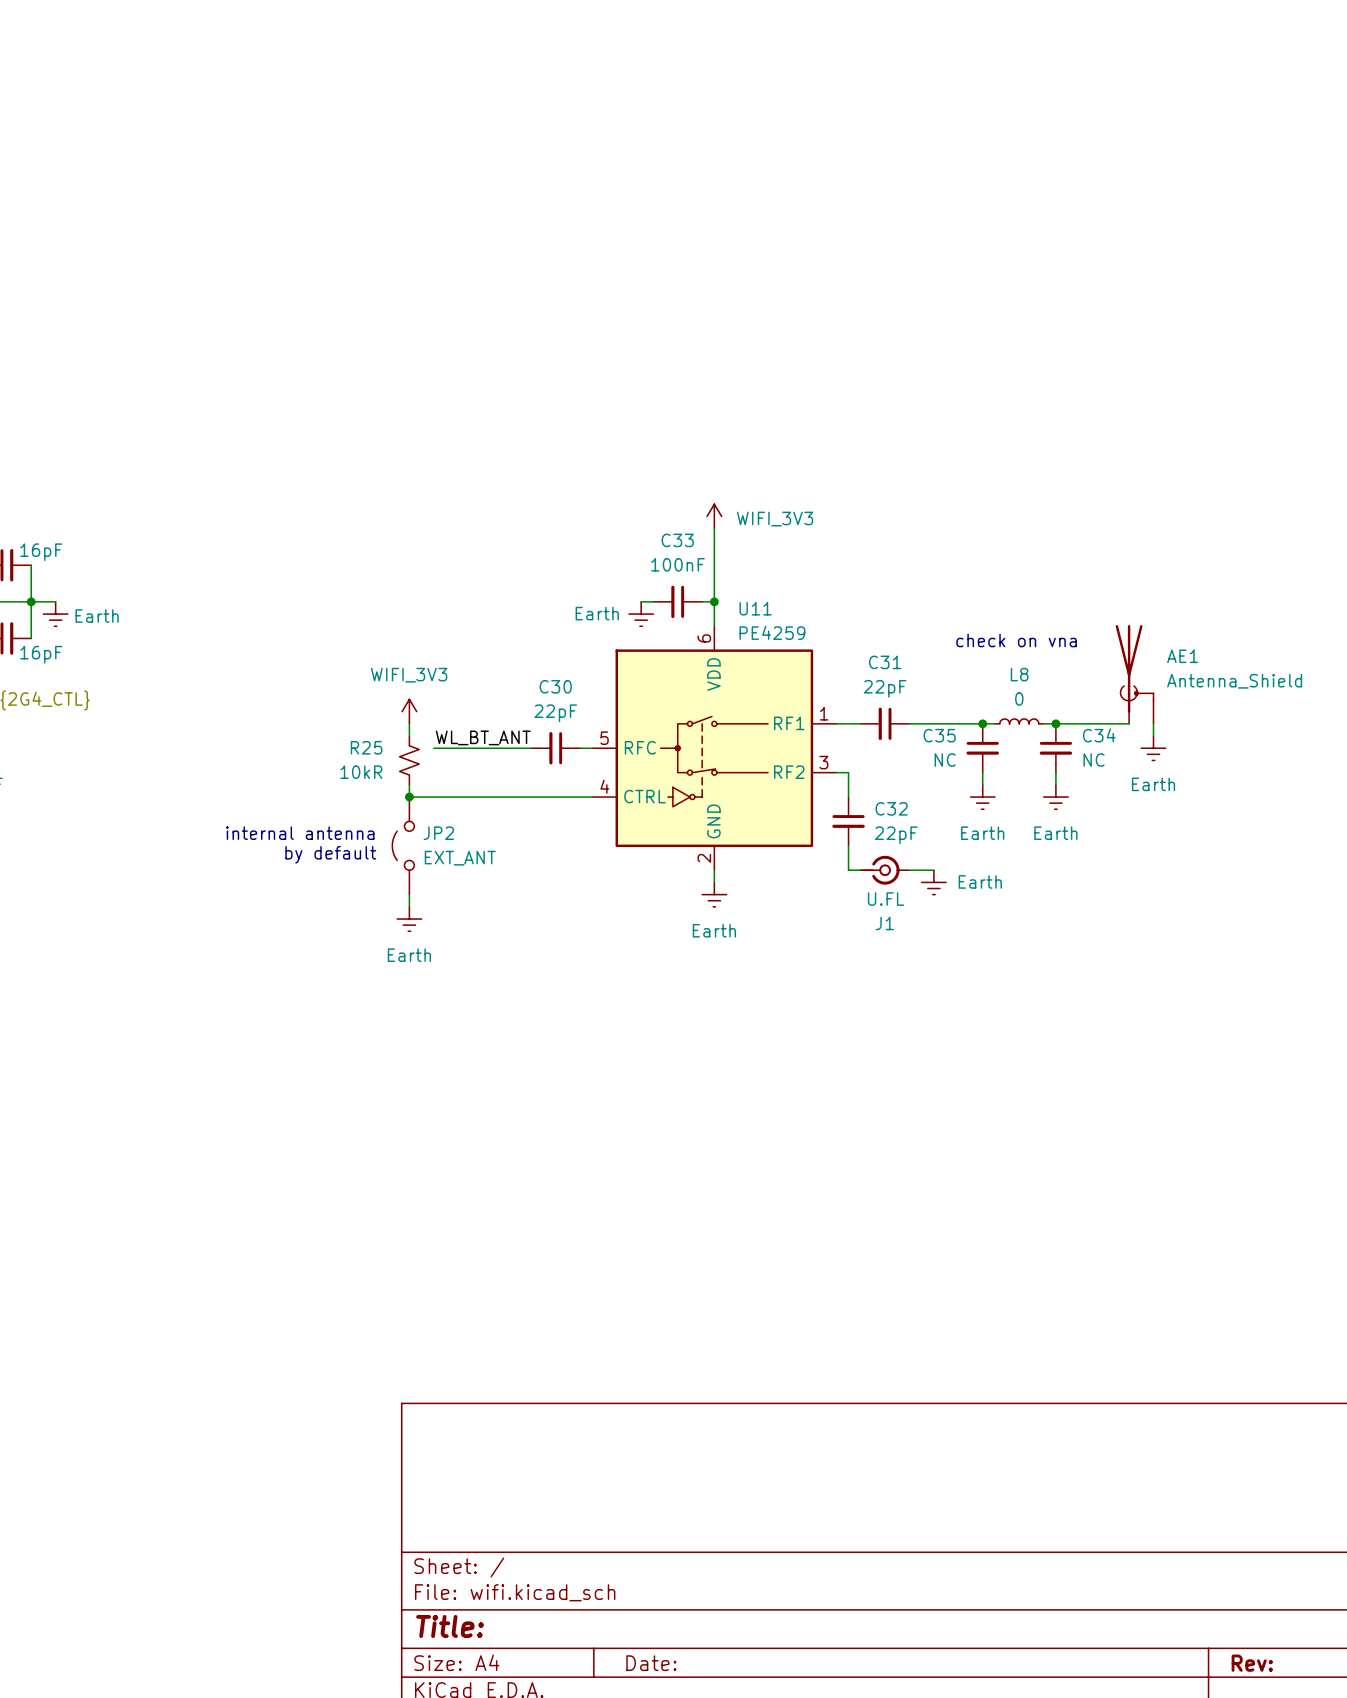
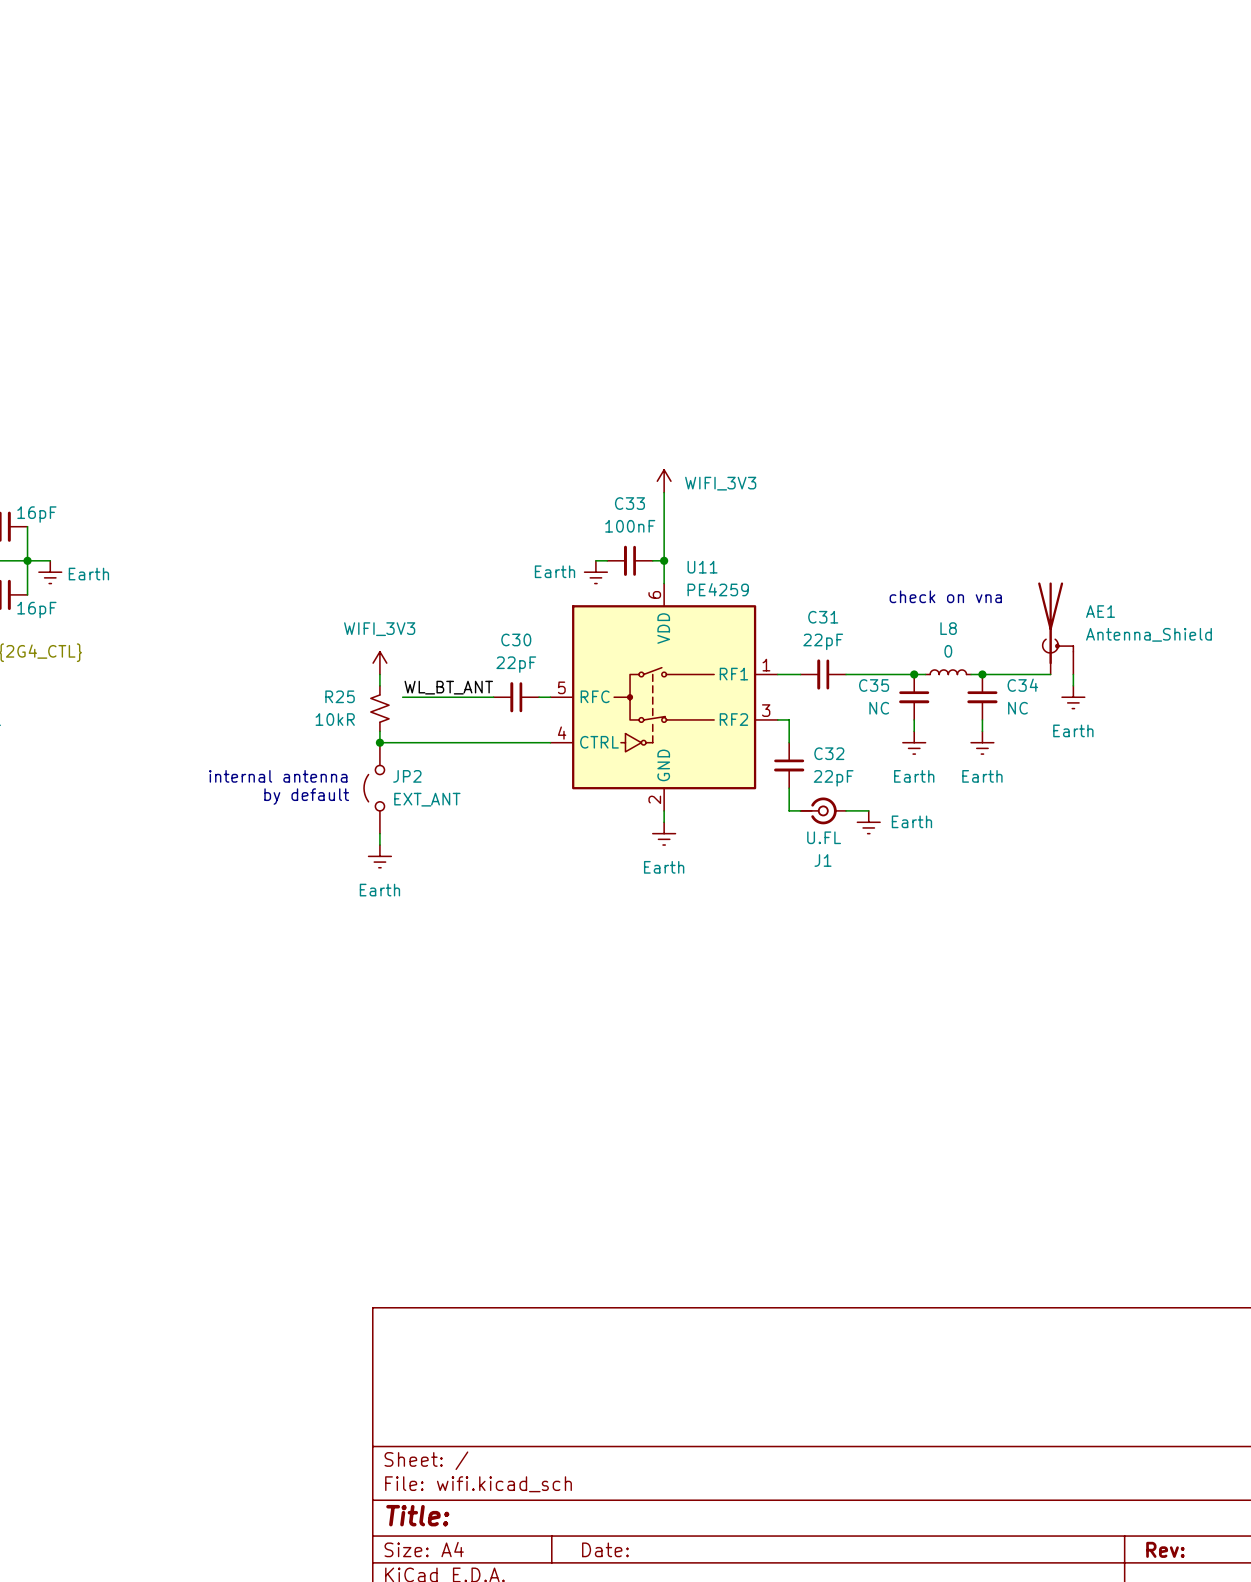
R25 flip: as is (409, 760) -> left-right (379, 708)

